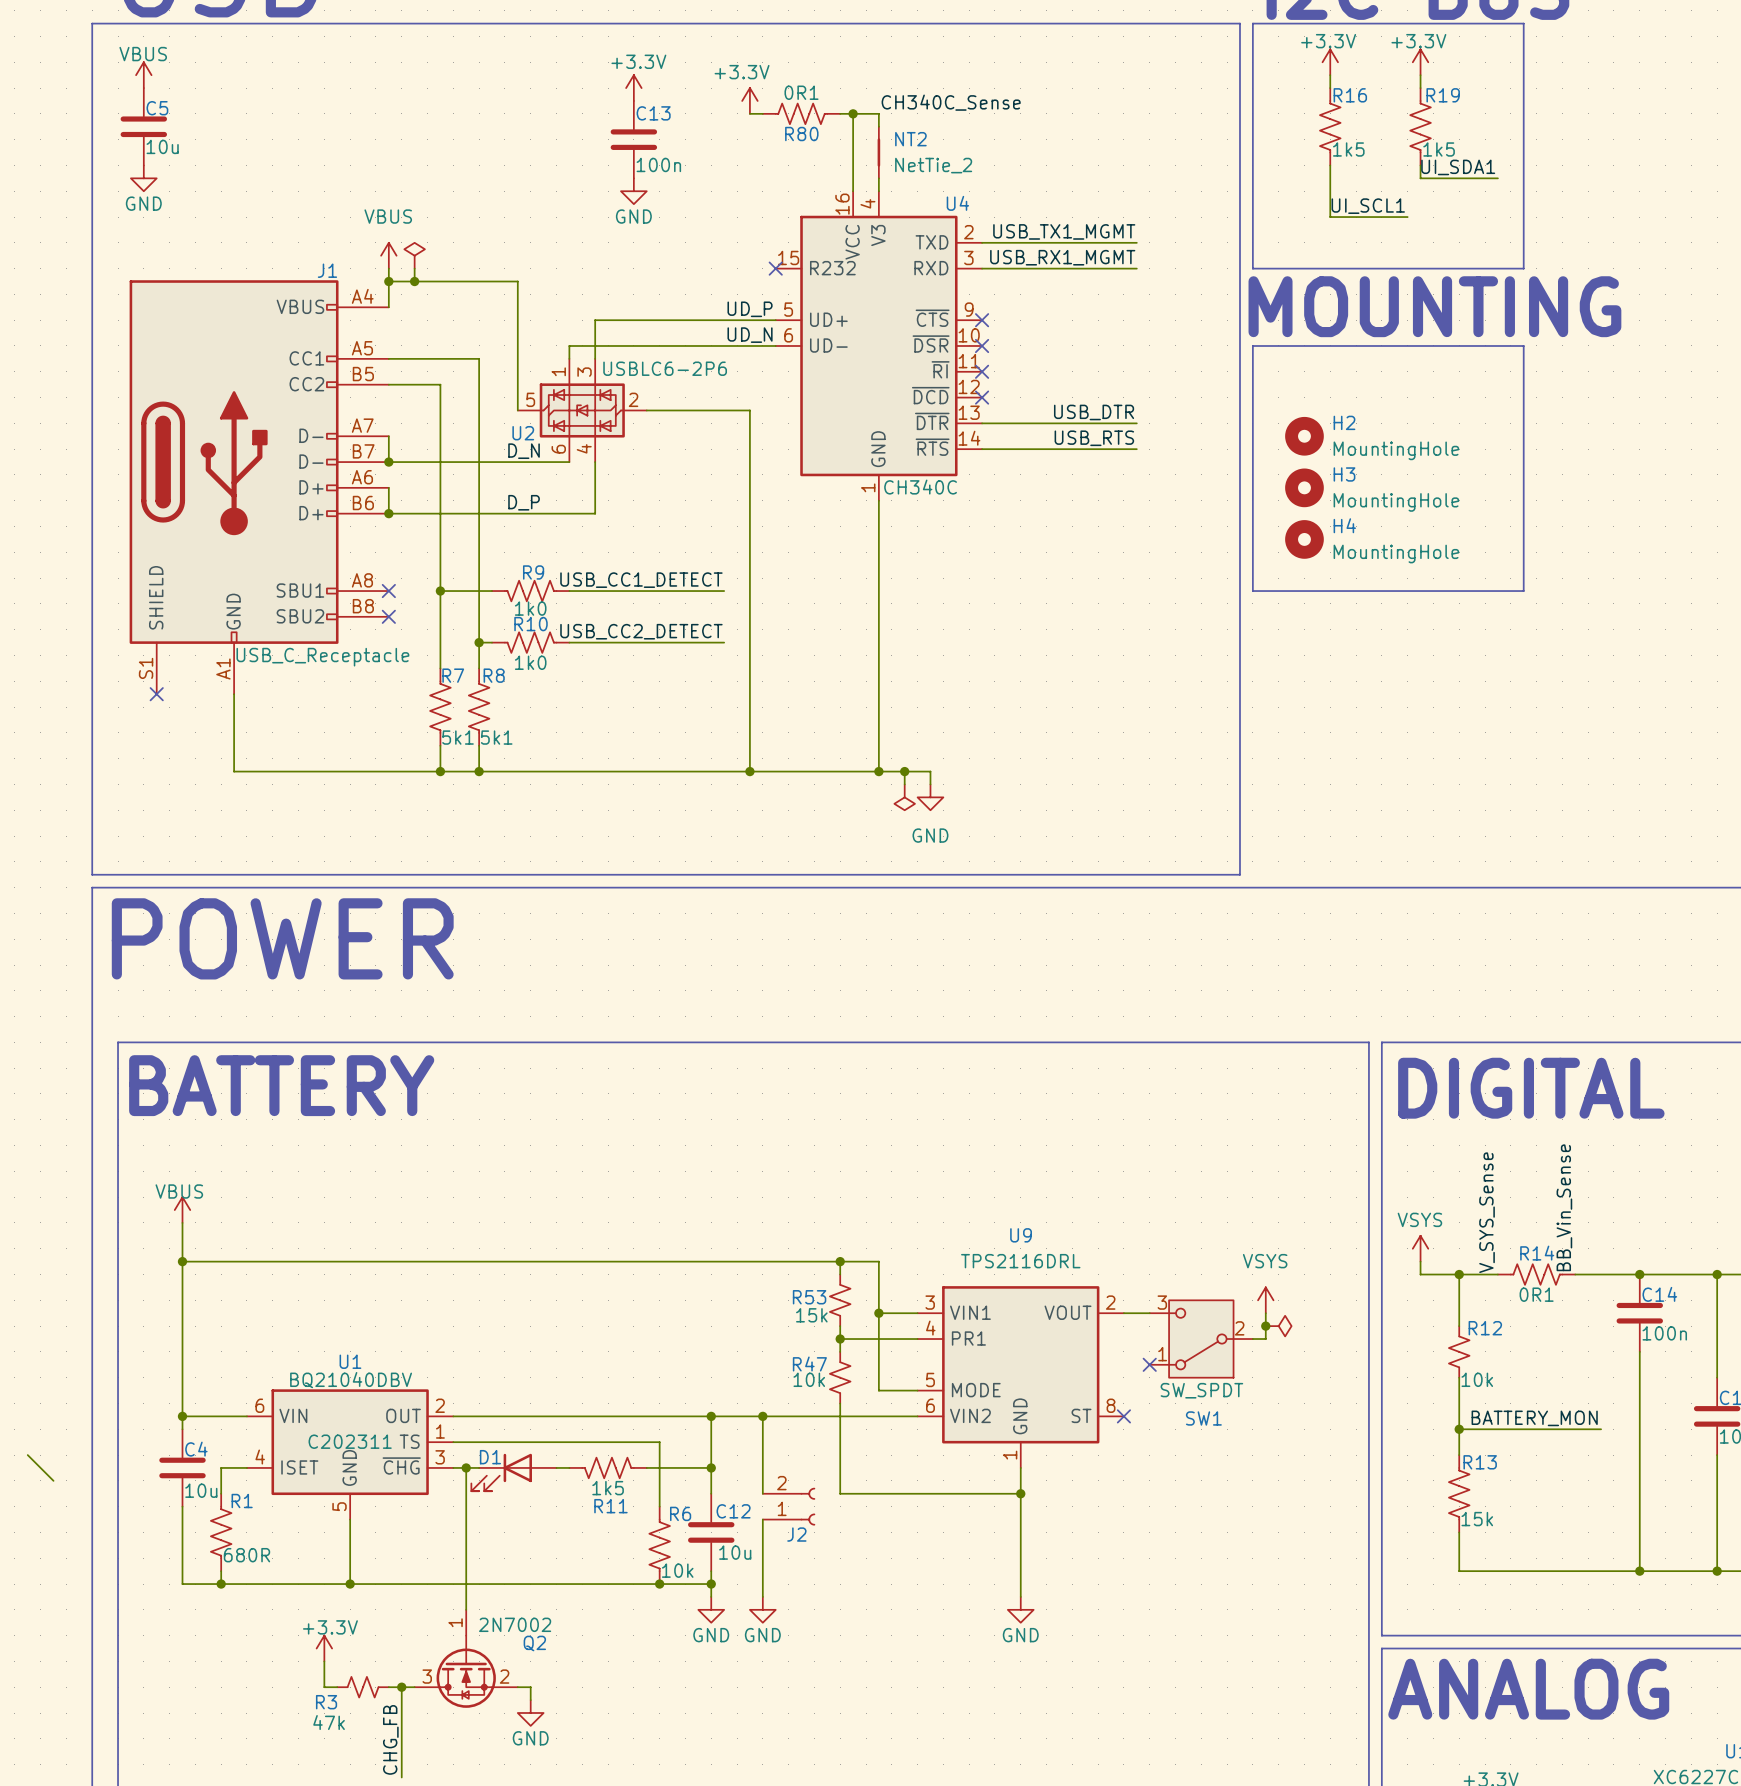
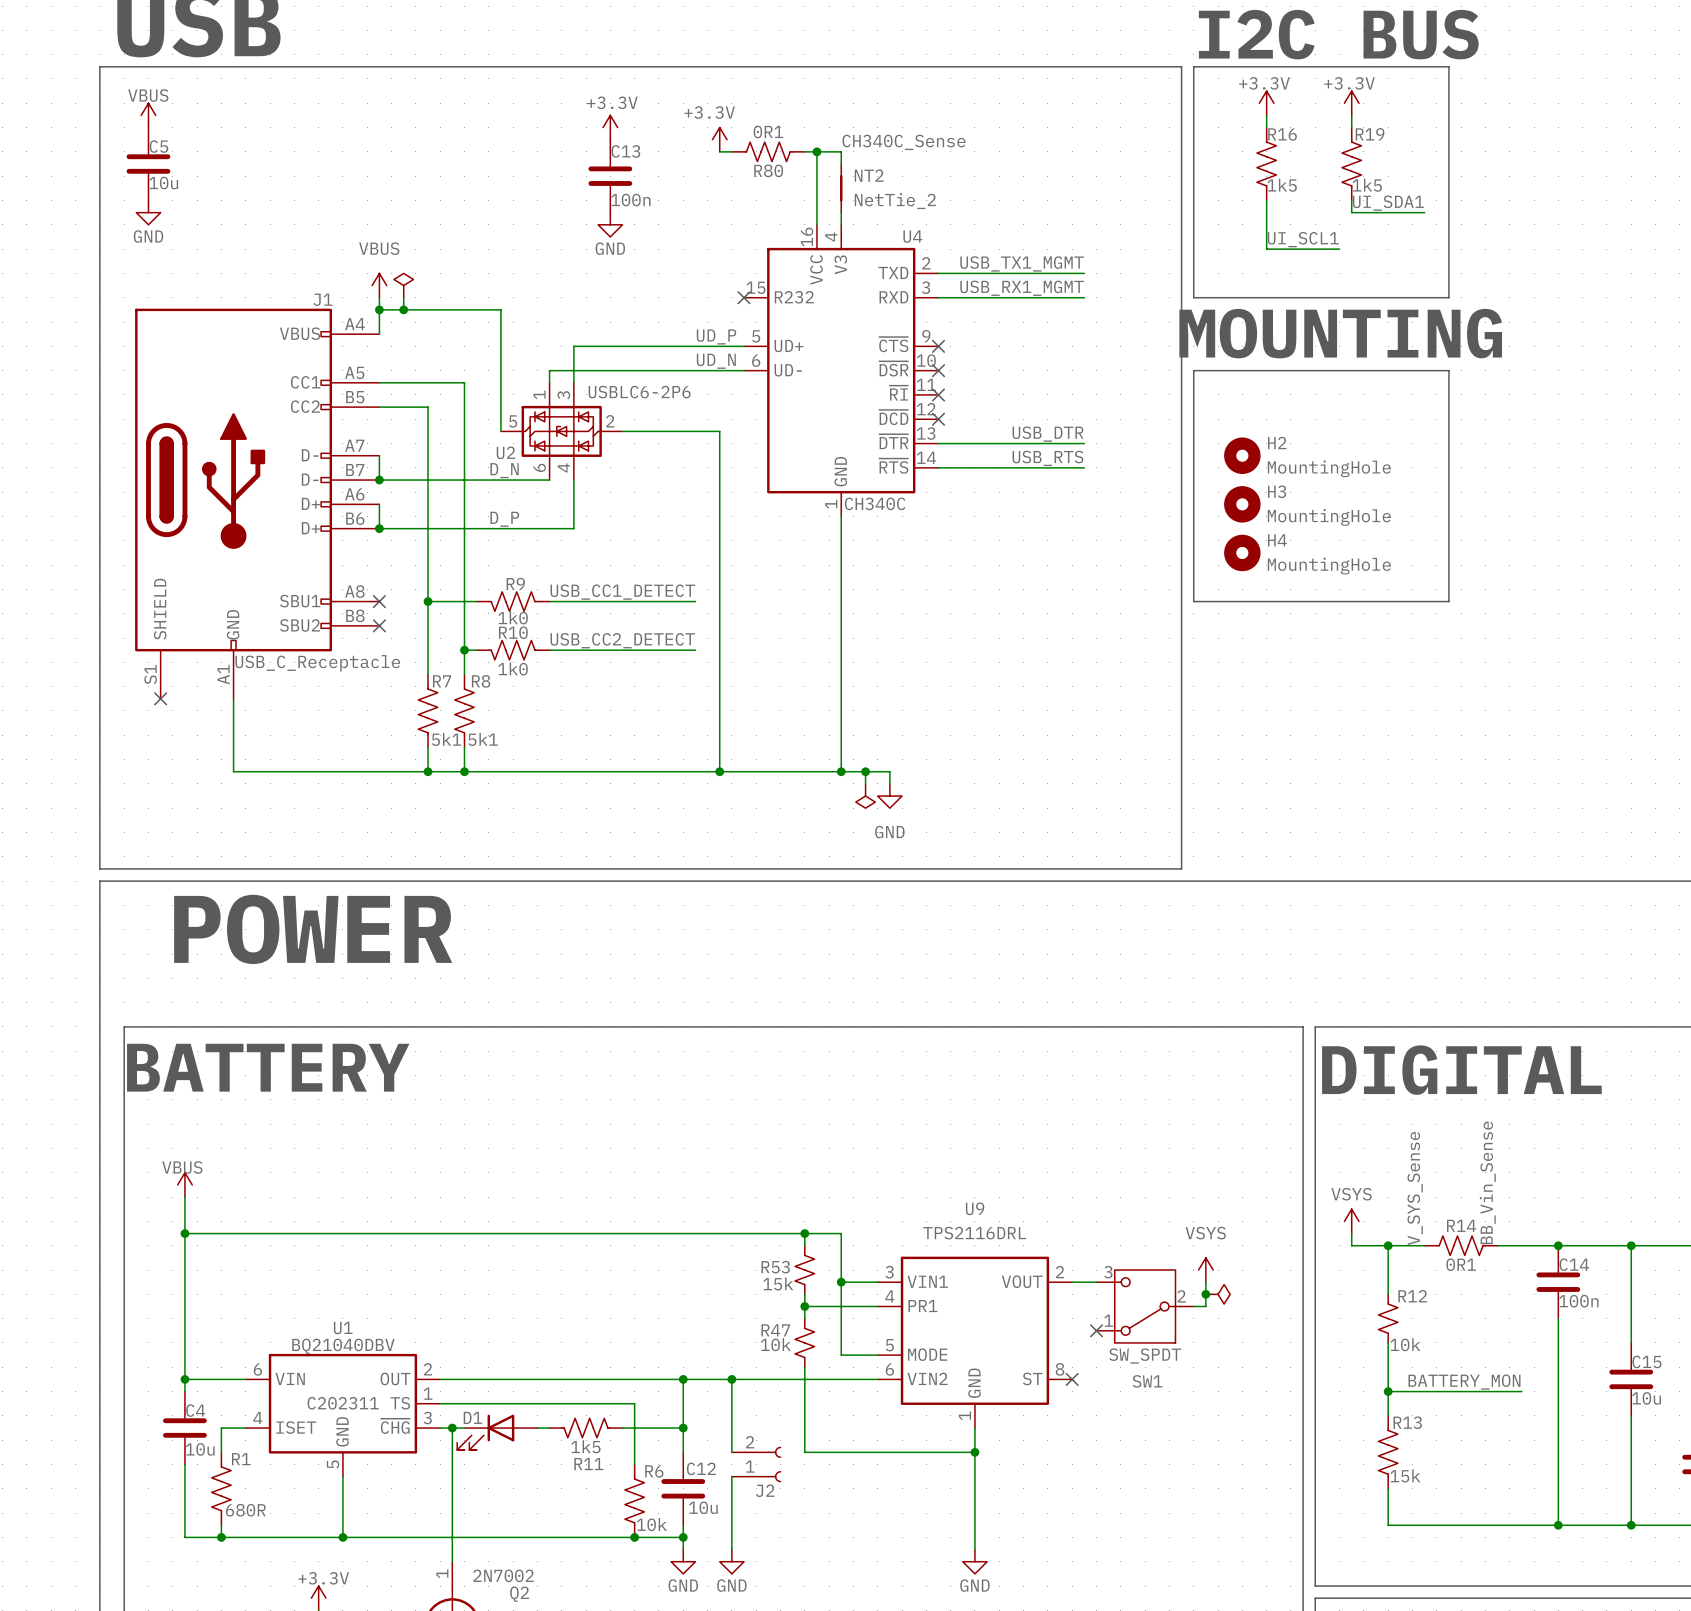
wire: (27, 1455) (53, 1480) -> none

